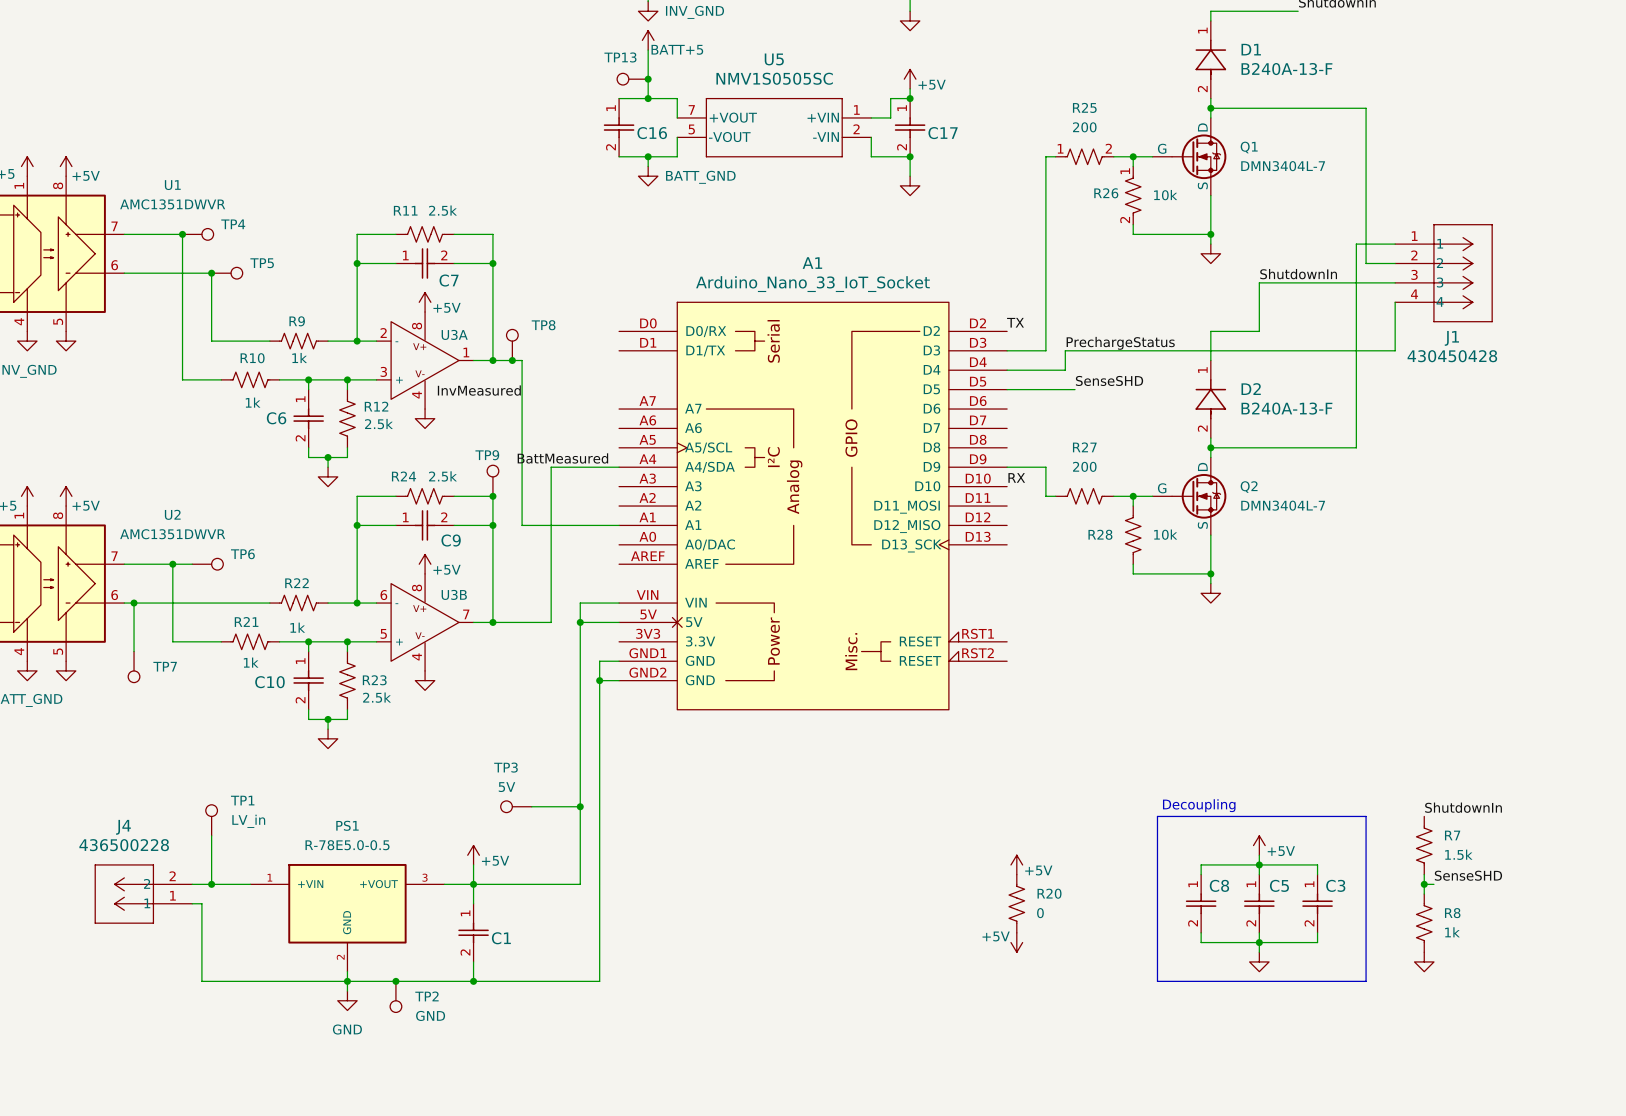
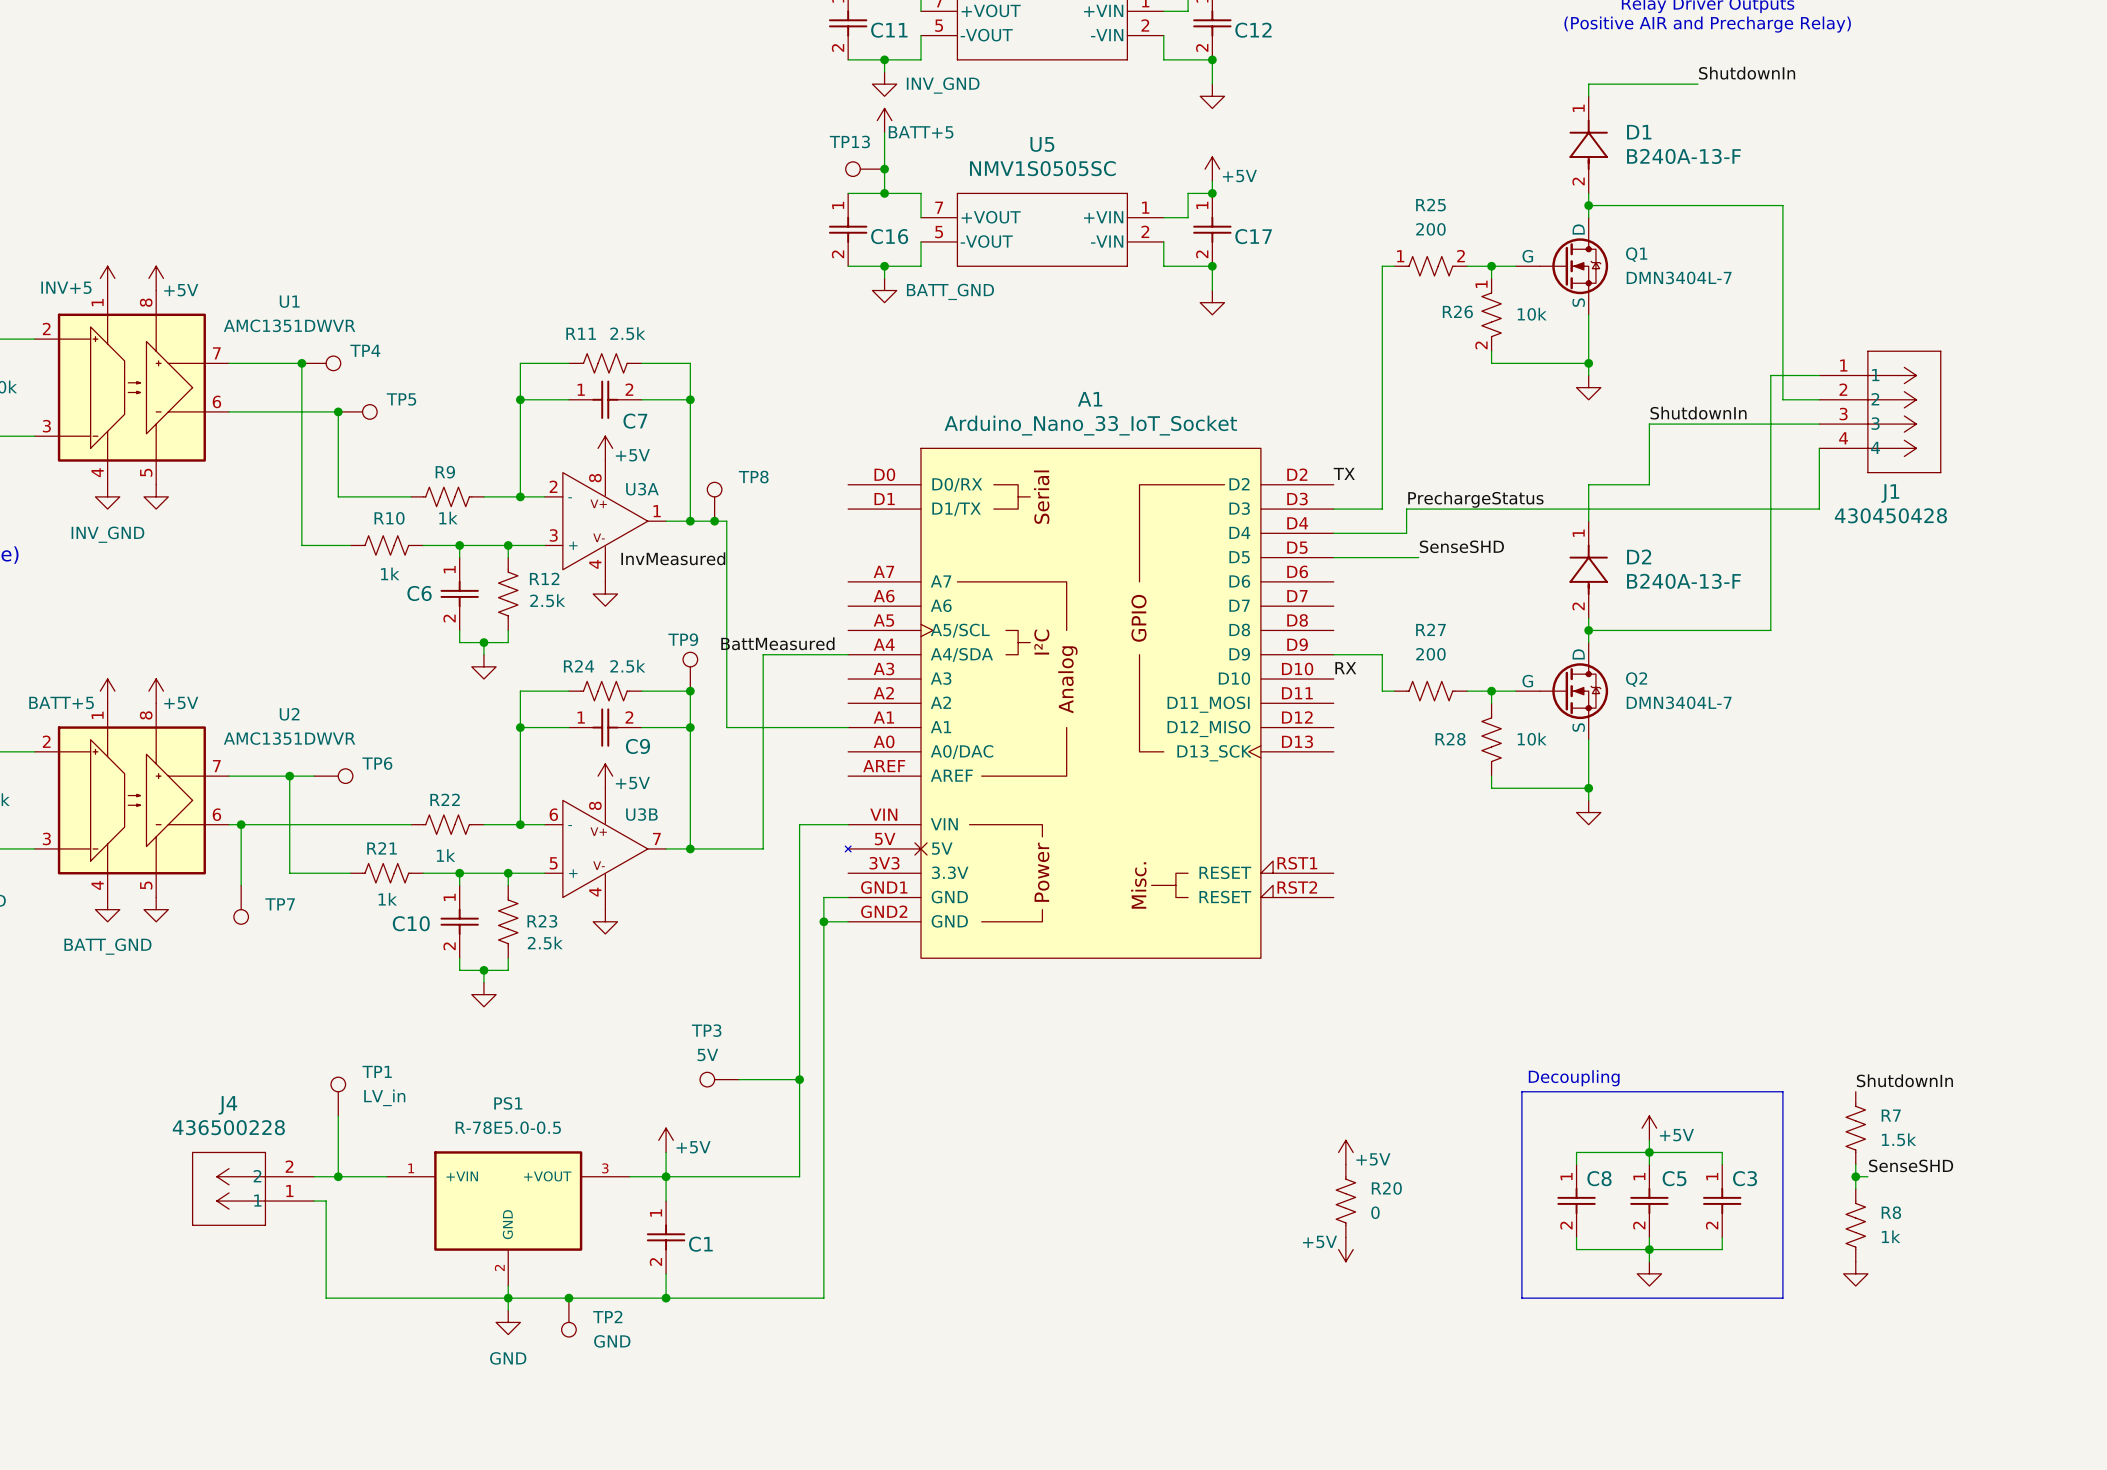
A1 symbol: [619, 302, 1008, 710] -> [845, 448, 1334, 959]
wire: (580, 622) (619, 622) -> none
junction: (580, 622) -> none

